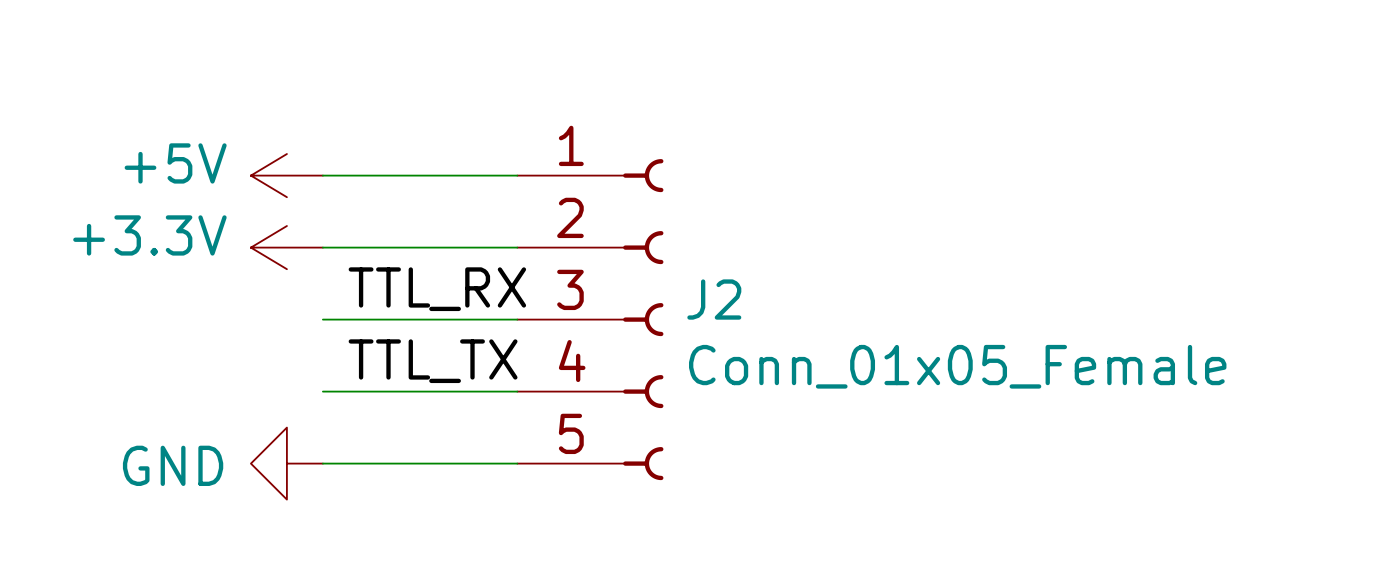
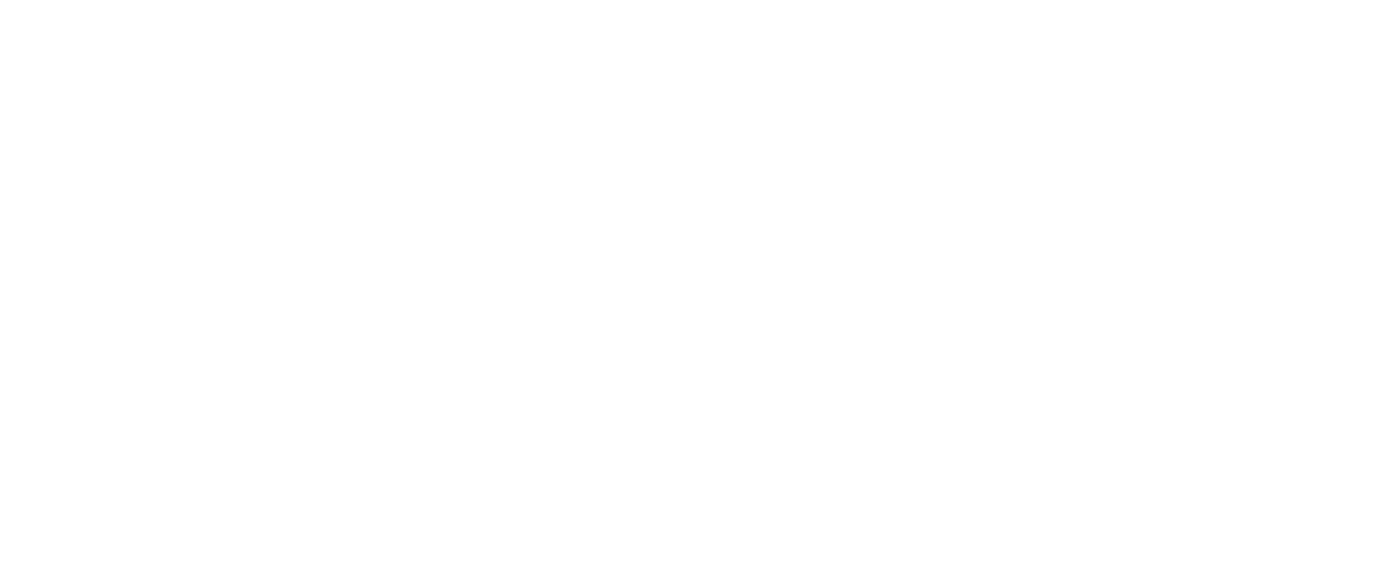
power symbol: +5V (286, 175) -> none
wire: (322, 175) (517, 175) -> none
power symbol: +3.3V (286, 247) -> none
wire: (322, 247) (517, 247) -> none
label: TTL_RX (437, 289) -> none
wire: (322, 319) (517, 319) -> none
J2: Conn_01x05_Female (590, 319) -> none
label: TTL_TX (433, 361) -> none
wire: (322, 391) (517, 391) -> none
power symbol: GND (286, 463) -> none
wire: (322, 463) (517, 463) -> none

